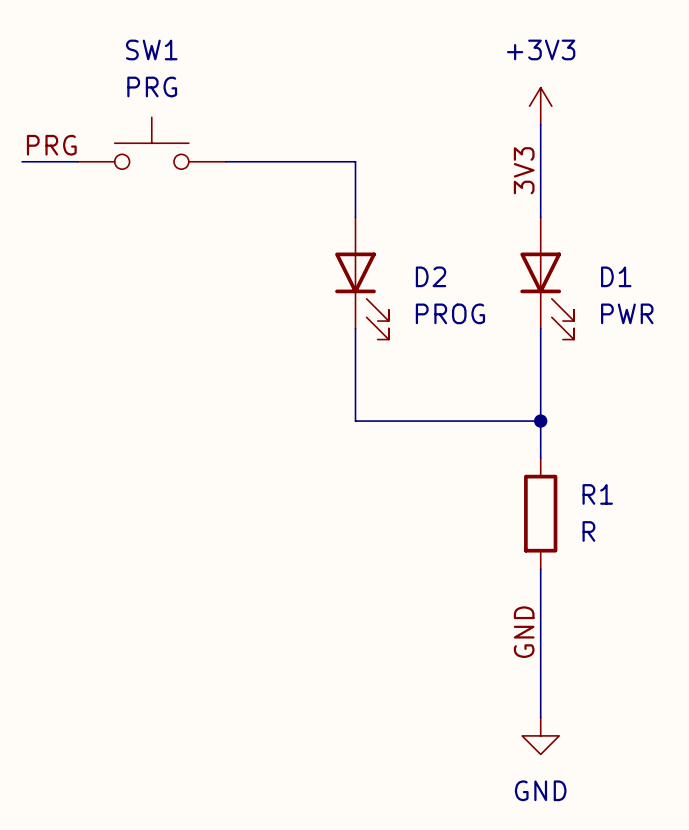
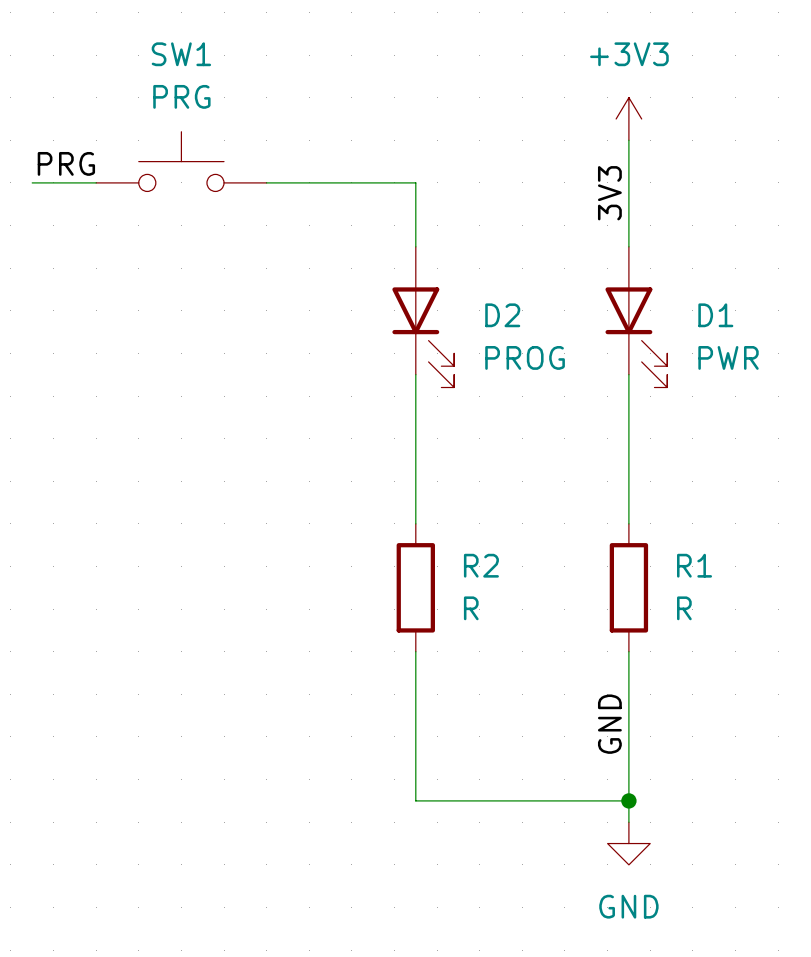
wire: (355, 421) (540, 421) -> (415, 481) (415, 523)
junction: (540, 421) -> none
R2: none -> R (415, 587)
wire: none -> (415, 651) (415, 800) (628, 800)
junction: none -> (628, 800)

